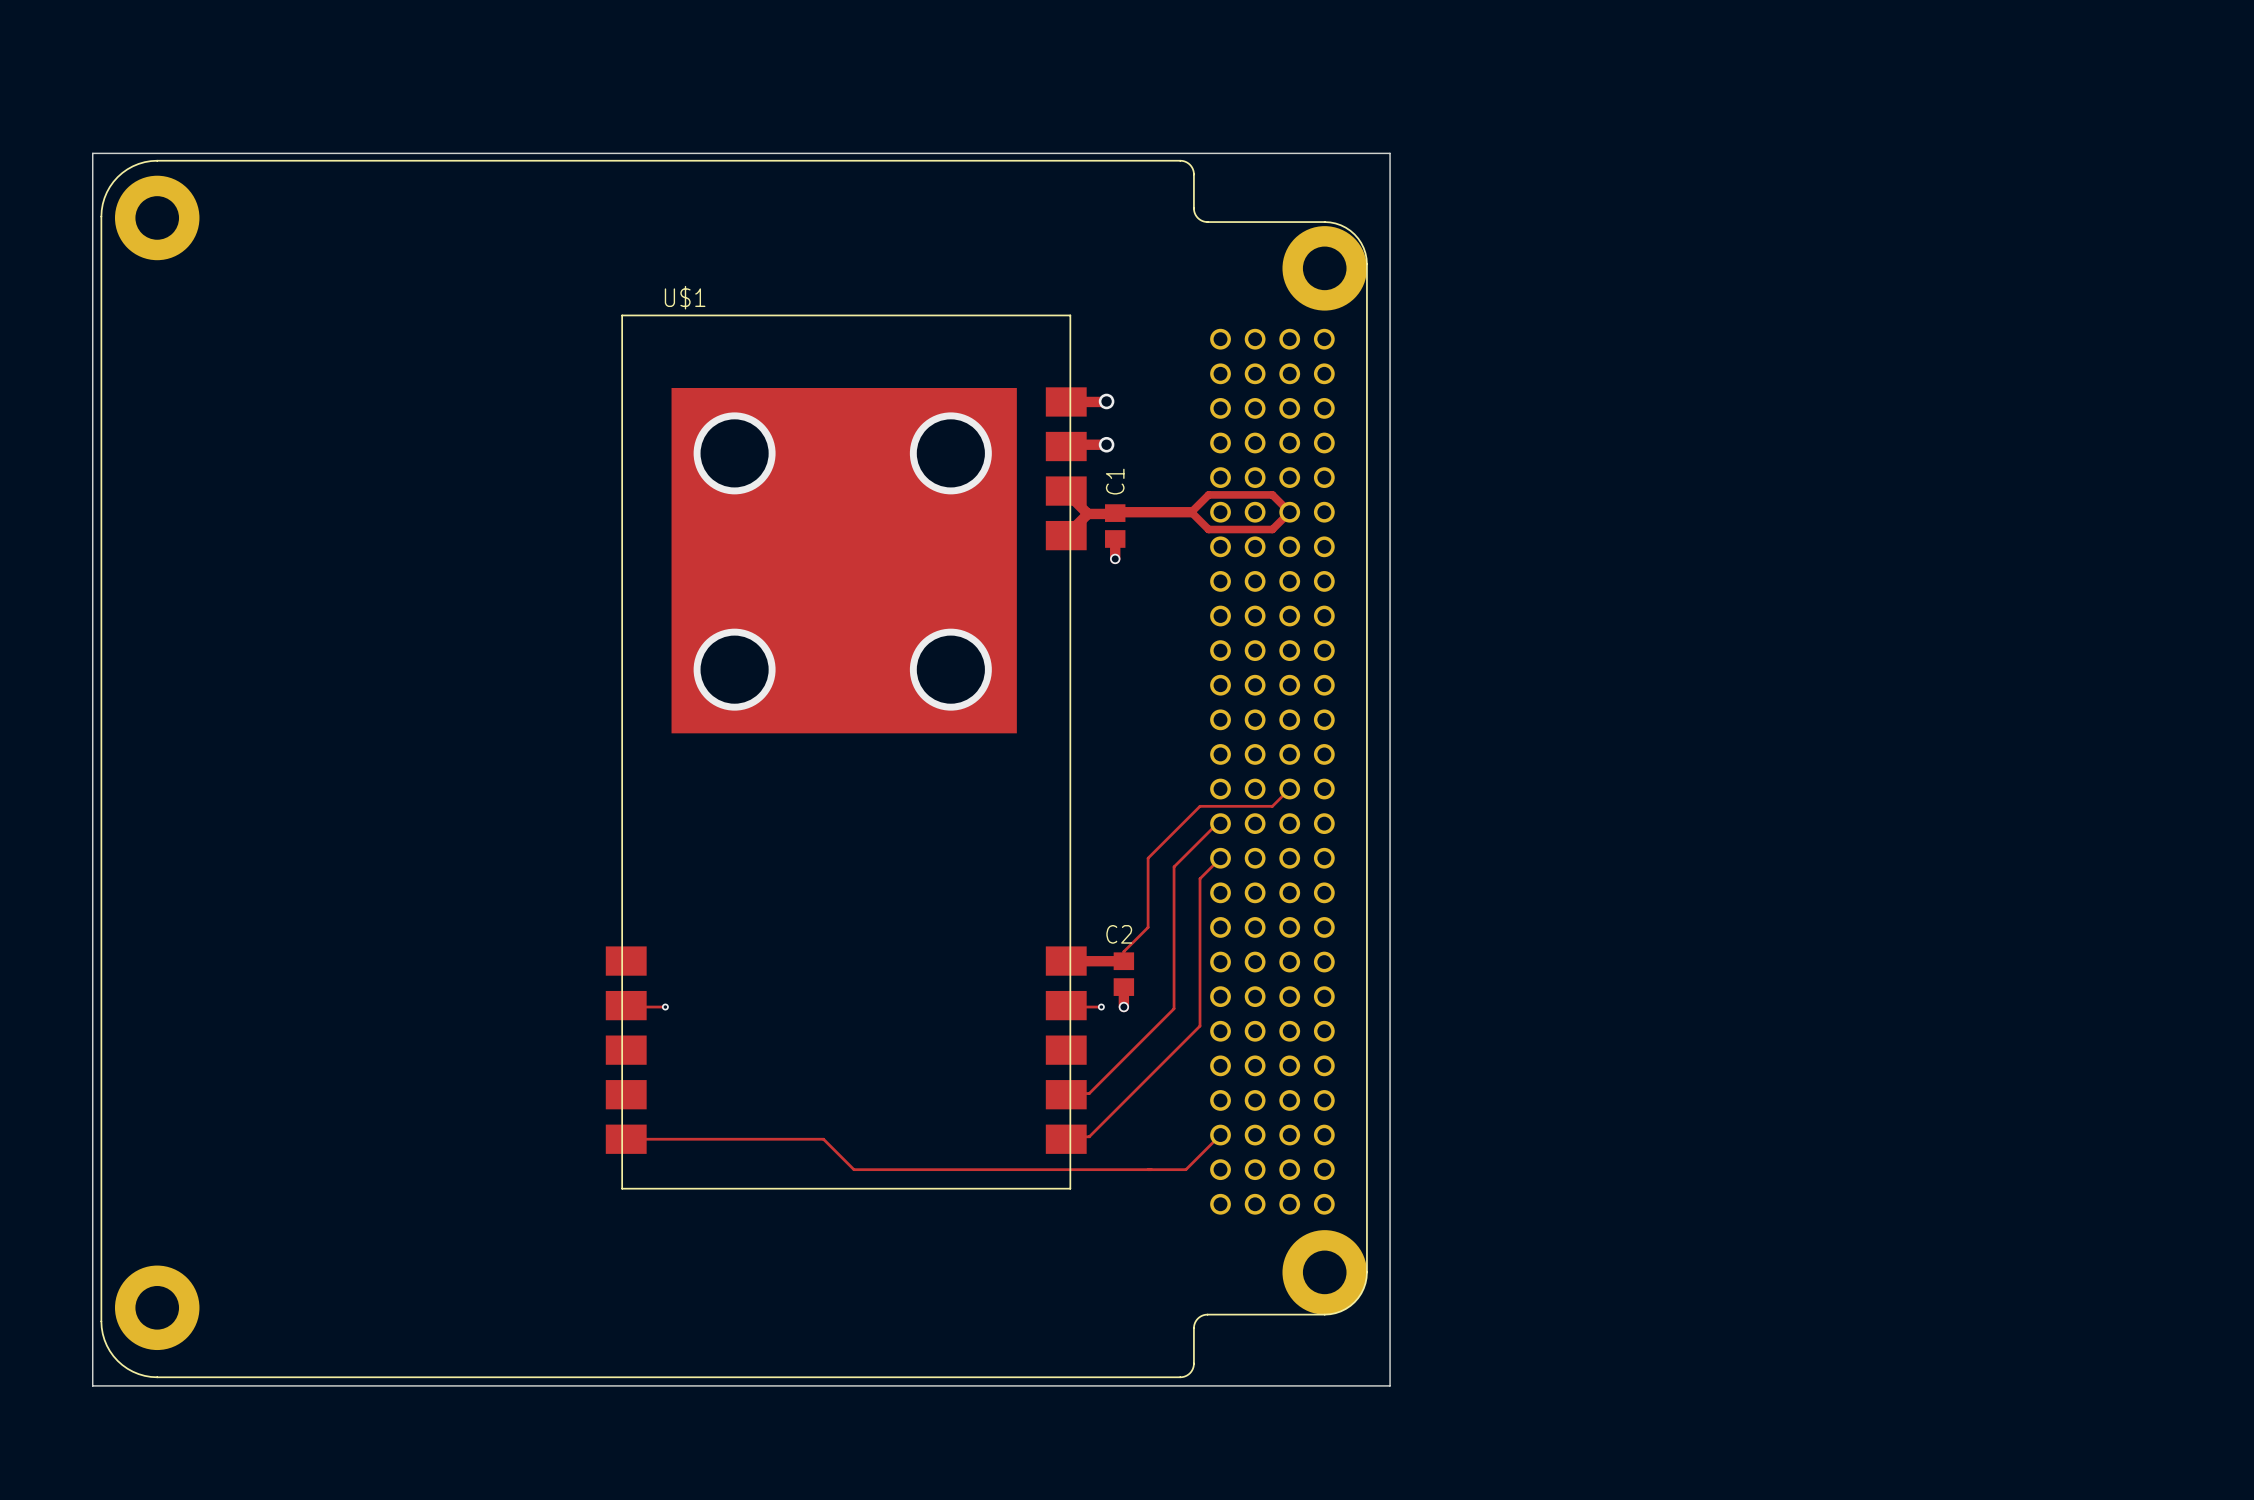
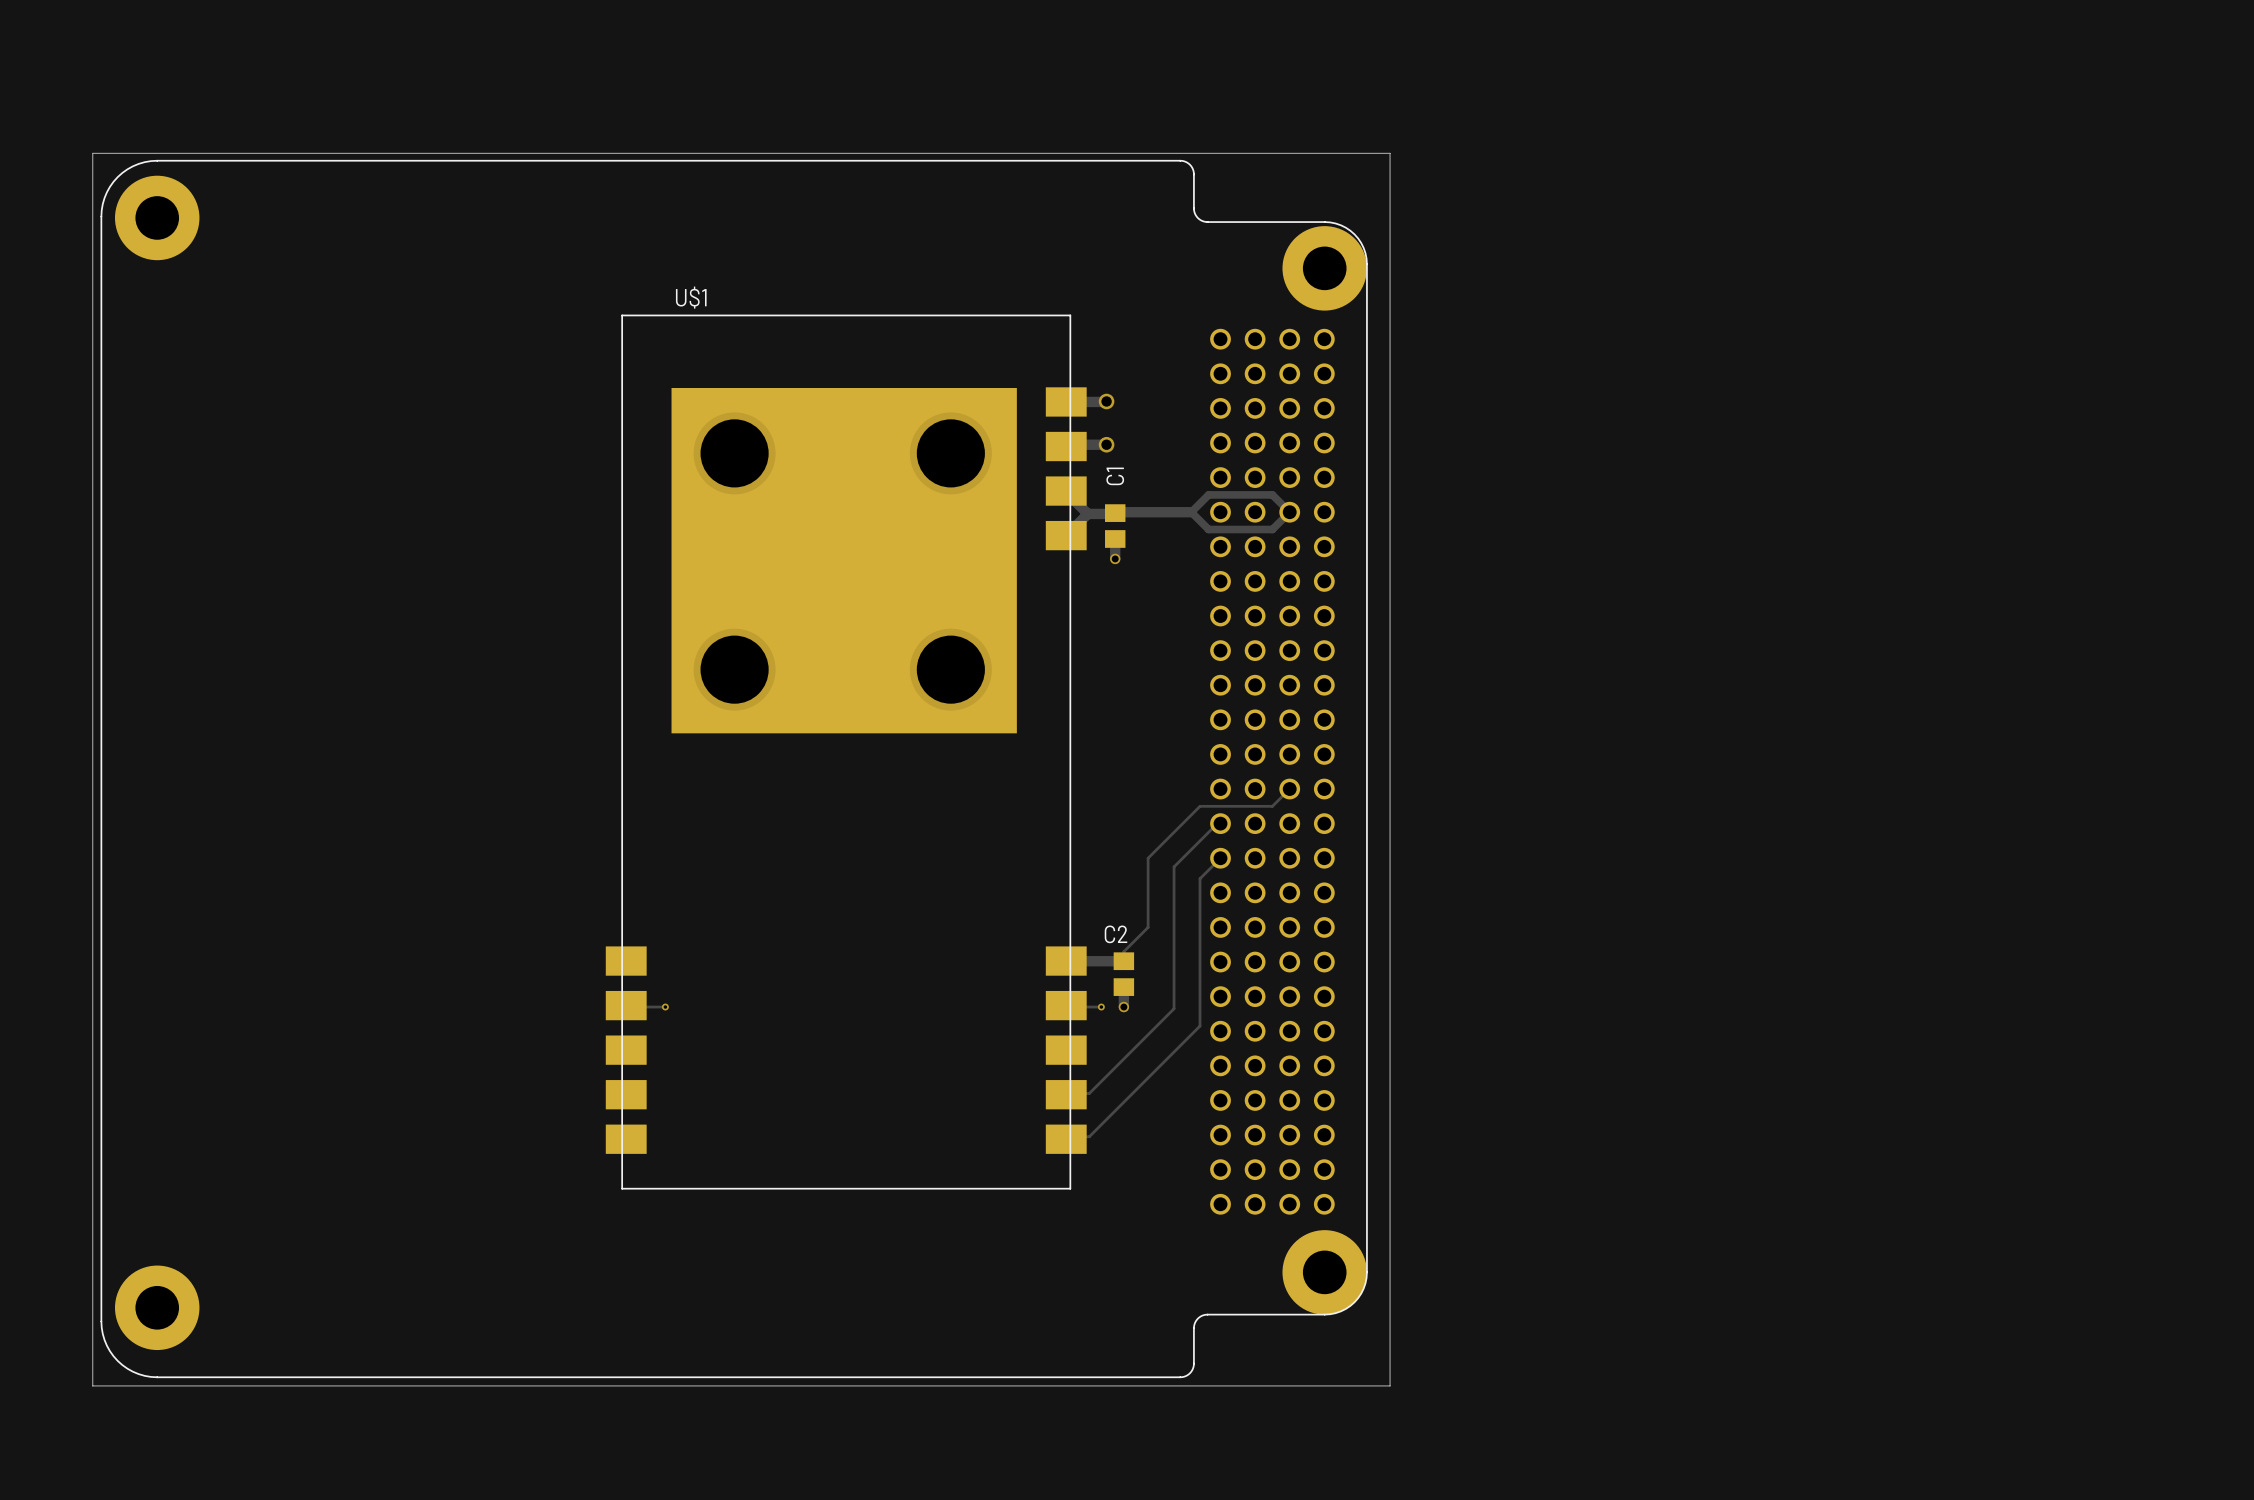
track: (1220, 1135) (1185, 1169) (853, 1169) (823, 1139) (626, 1139) -> none

